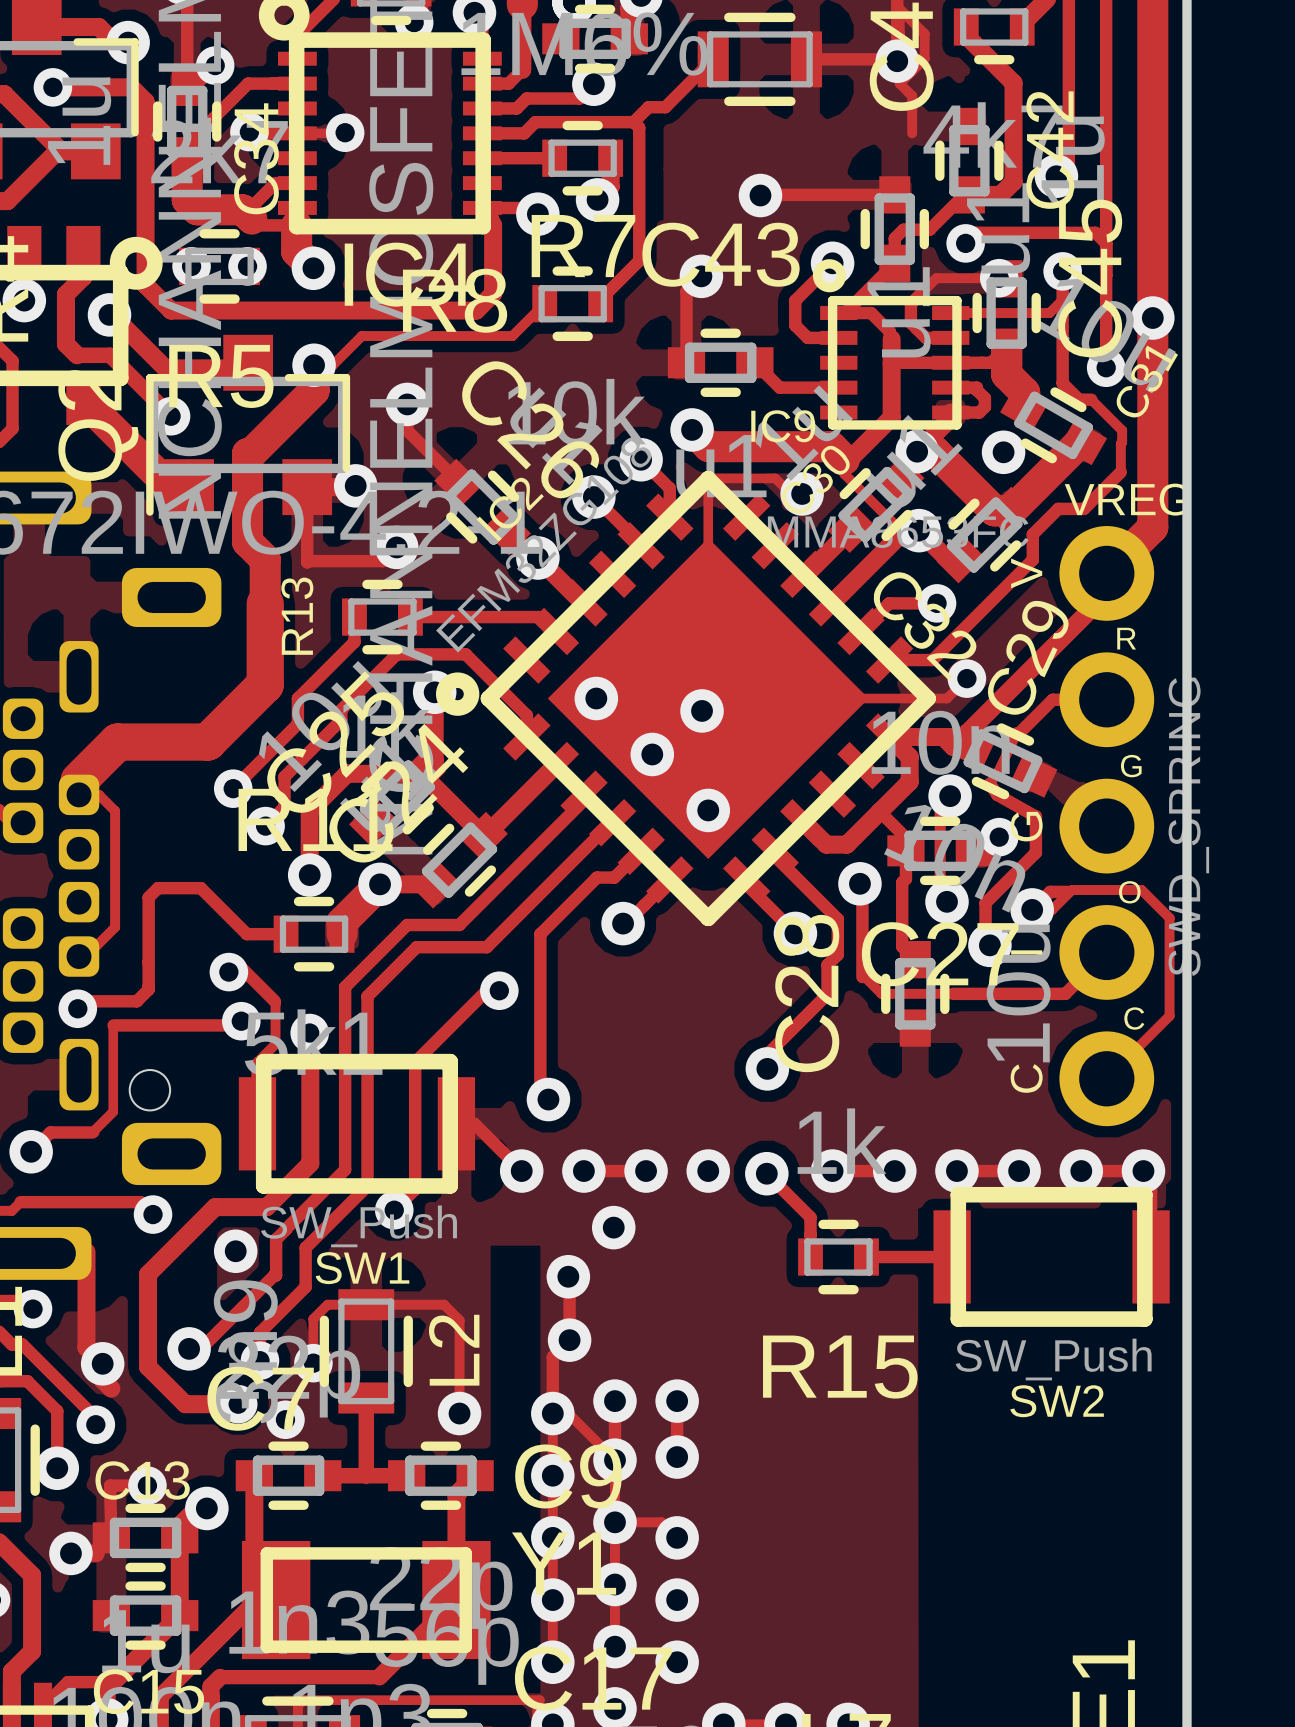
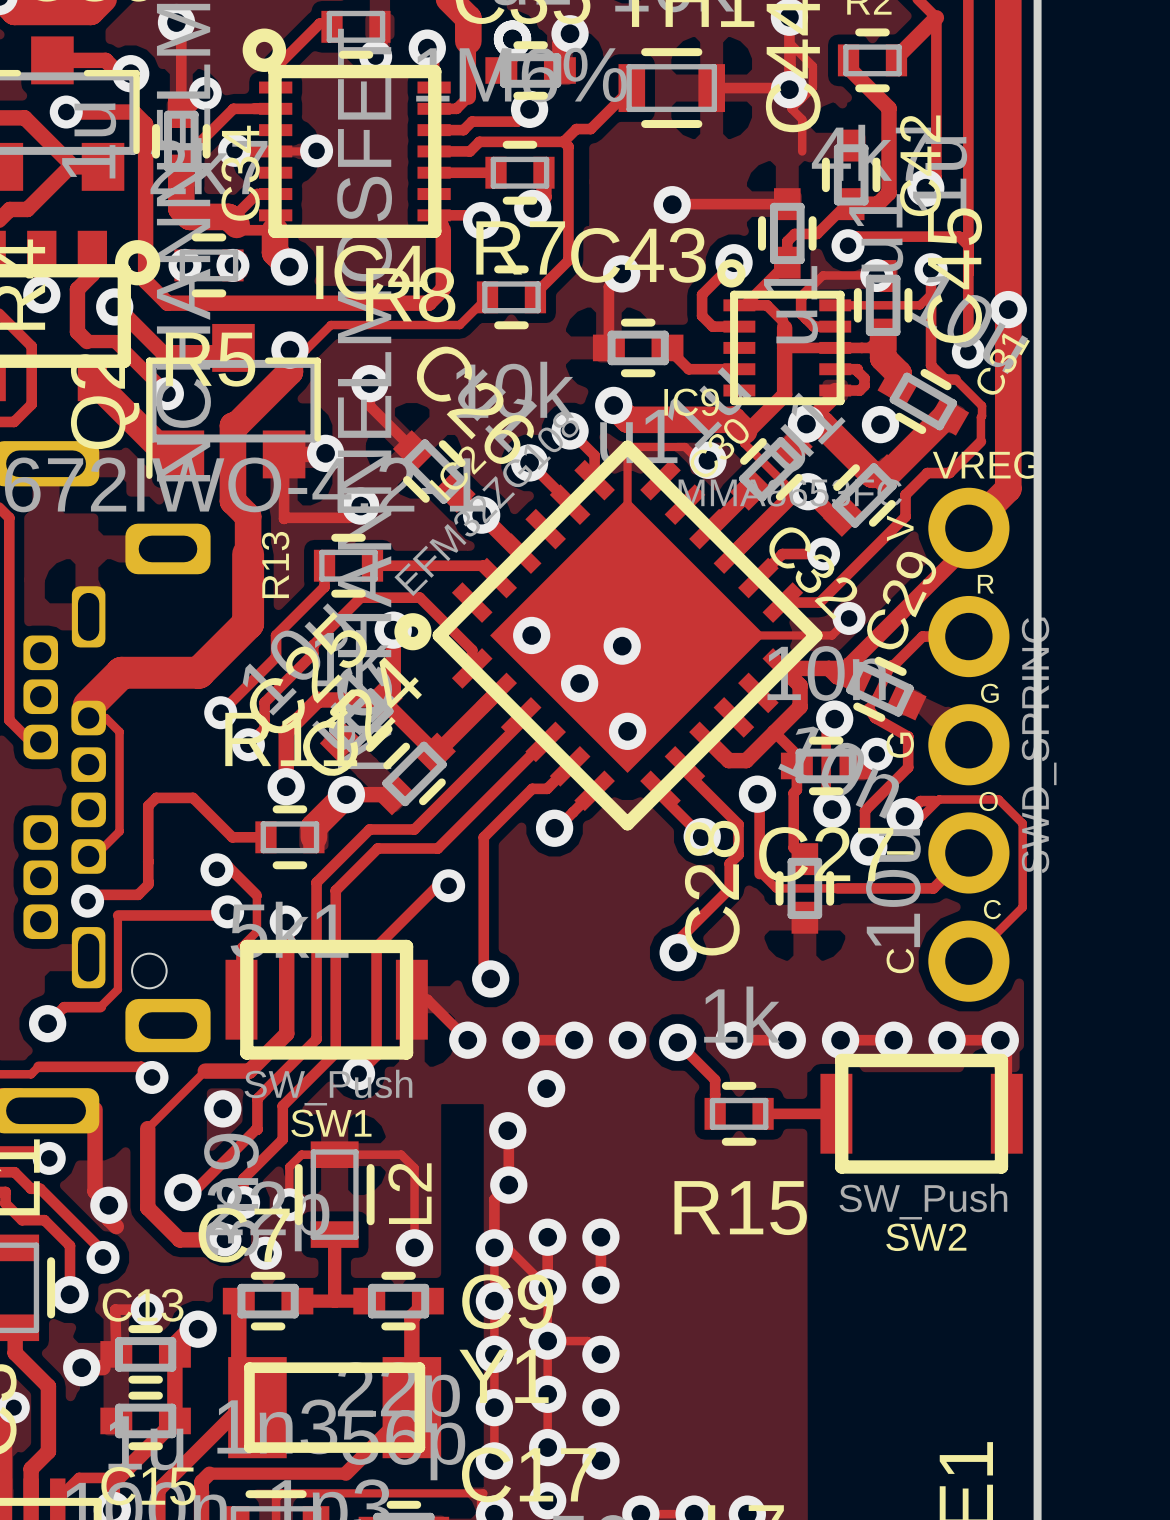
track width: thick (215, 1207) (148, 1274) -> thin (205, 1071) (147, 1128)

